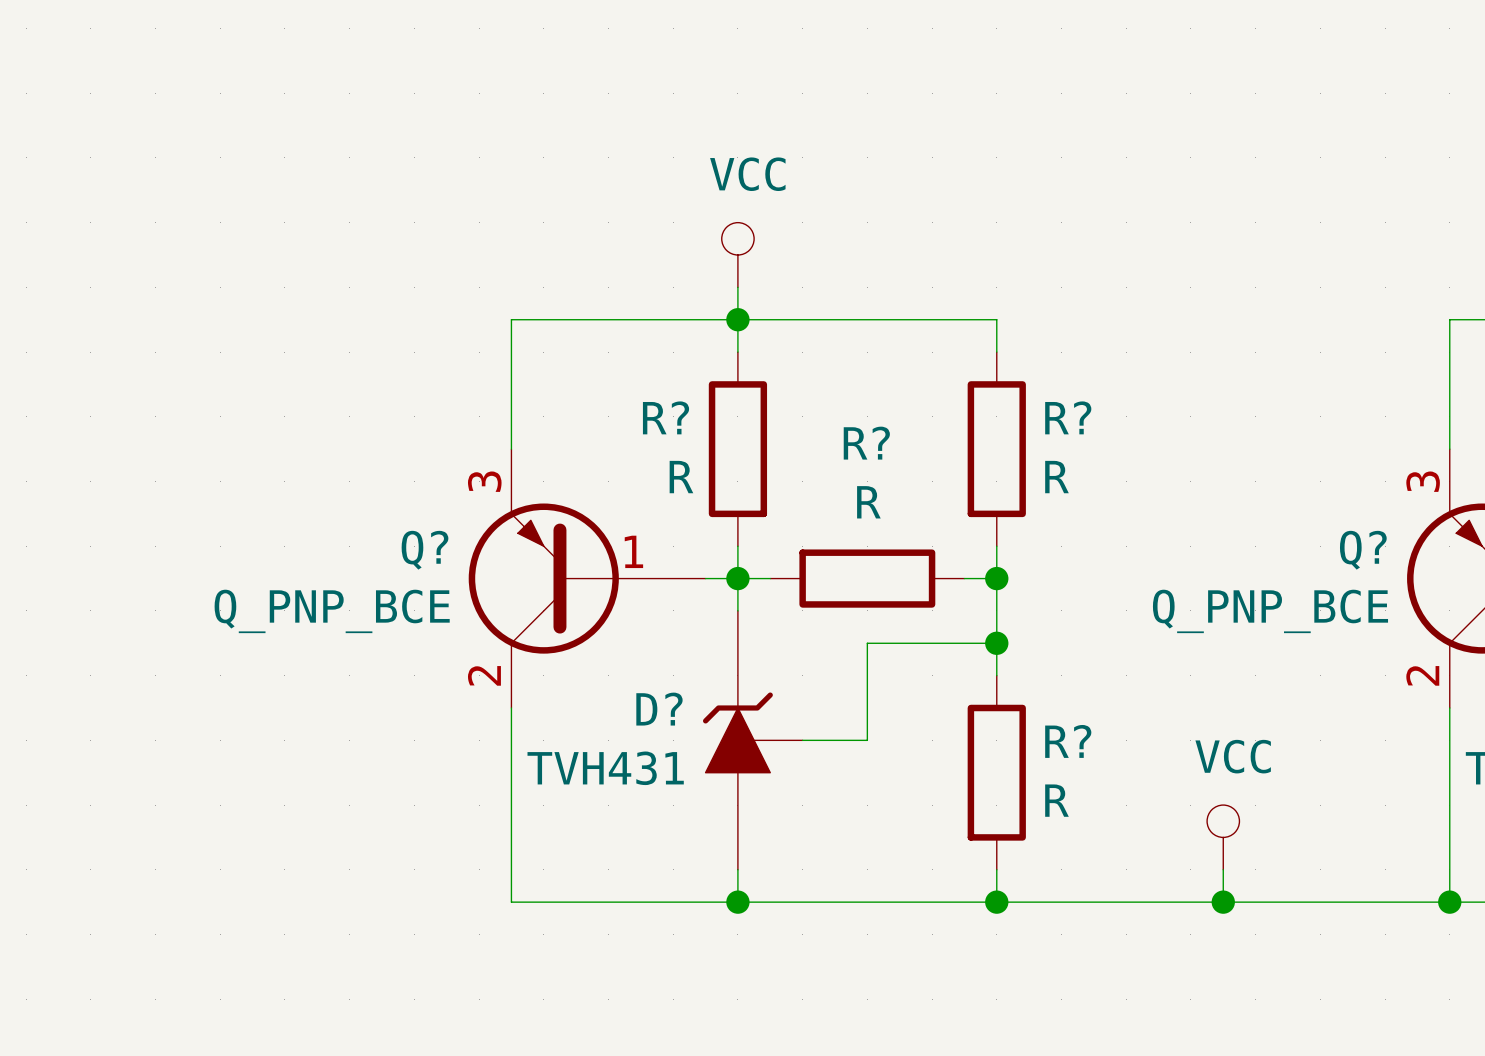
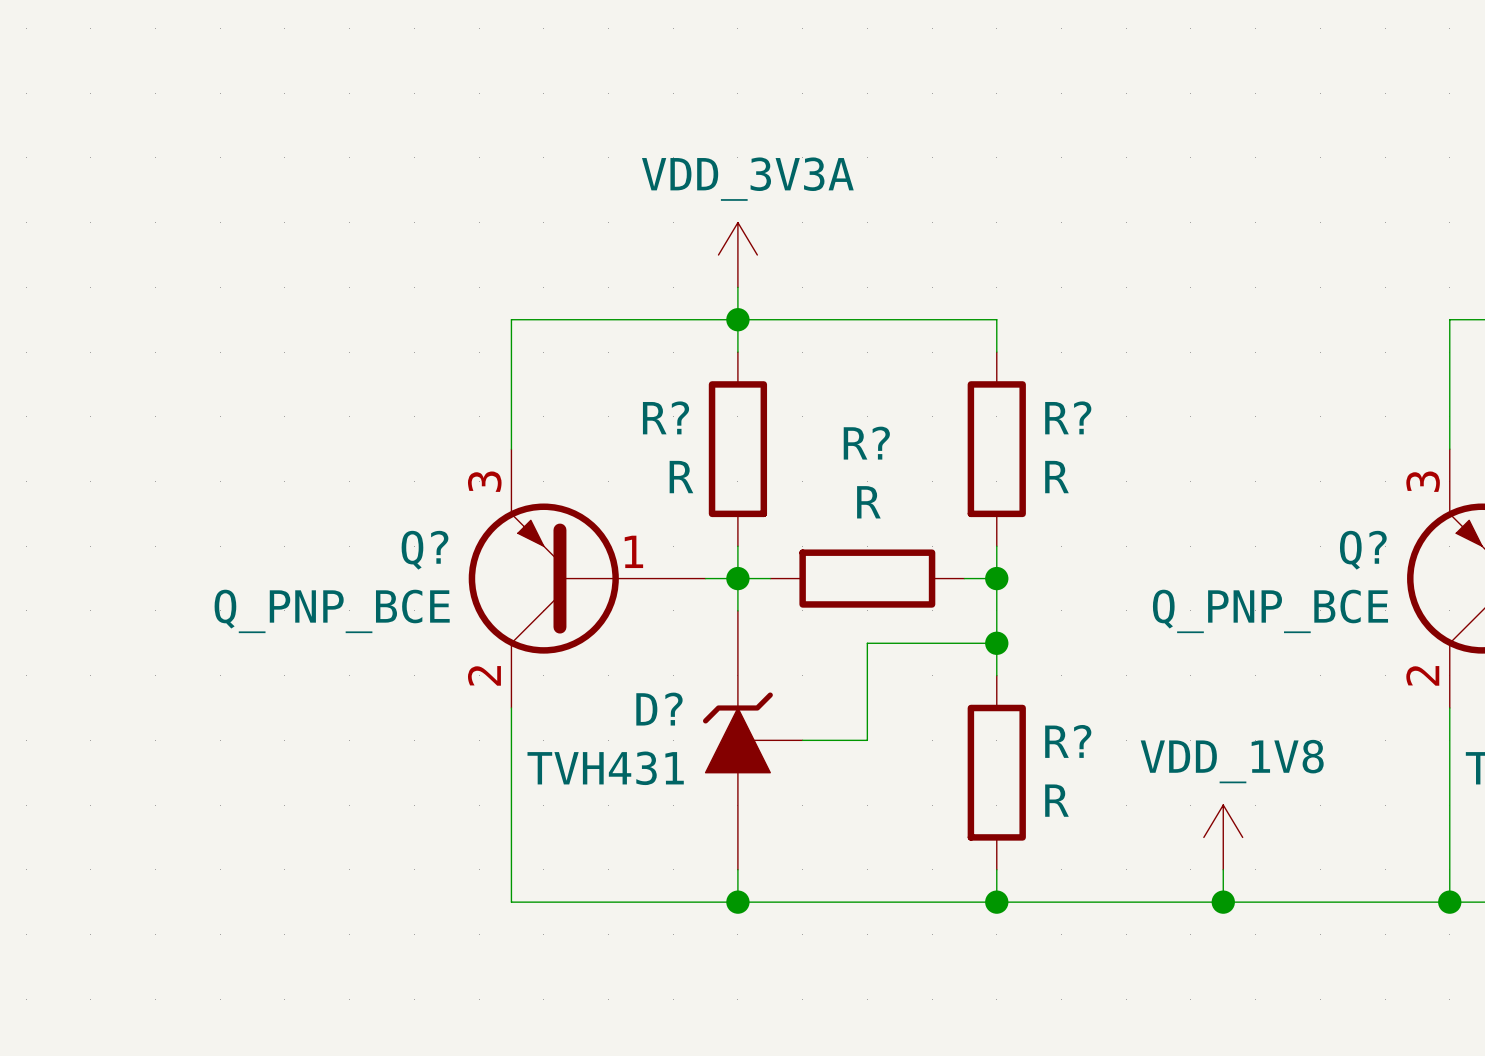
power symbol: VCC (737, 255) -> VDD_3V3A (737, 255)
power symbol: VCC (1223, 837) -> VDD_1V8 (1223, 837)

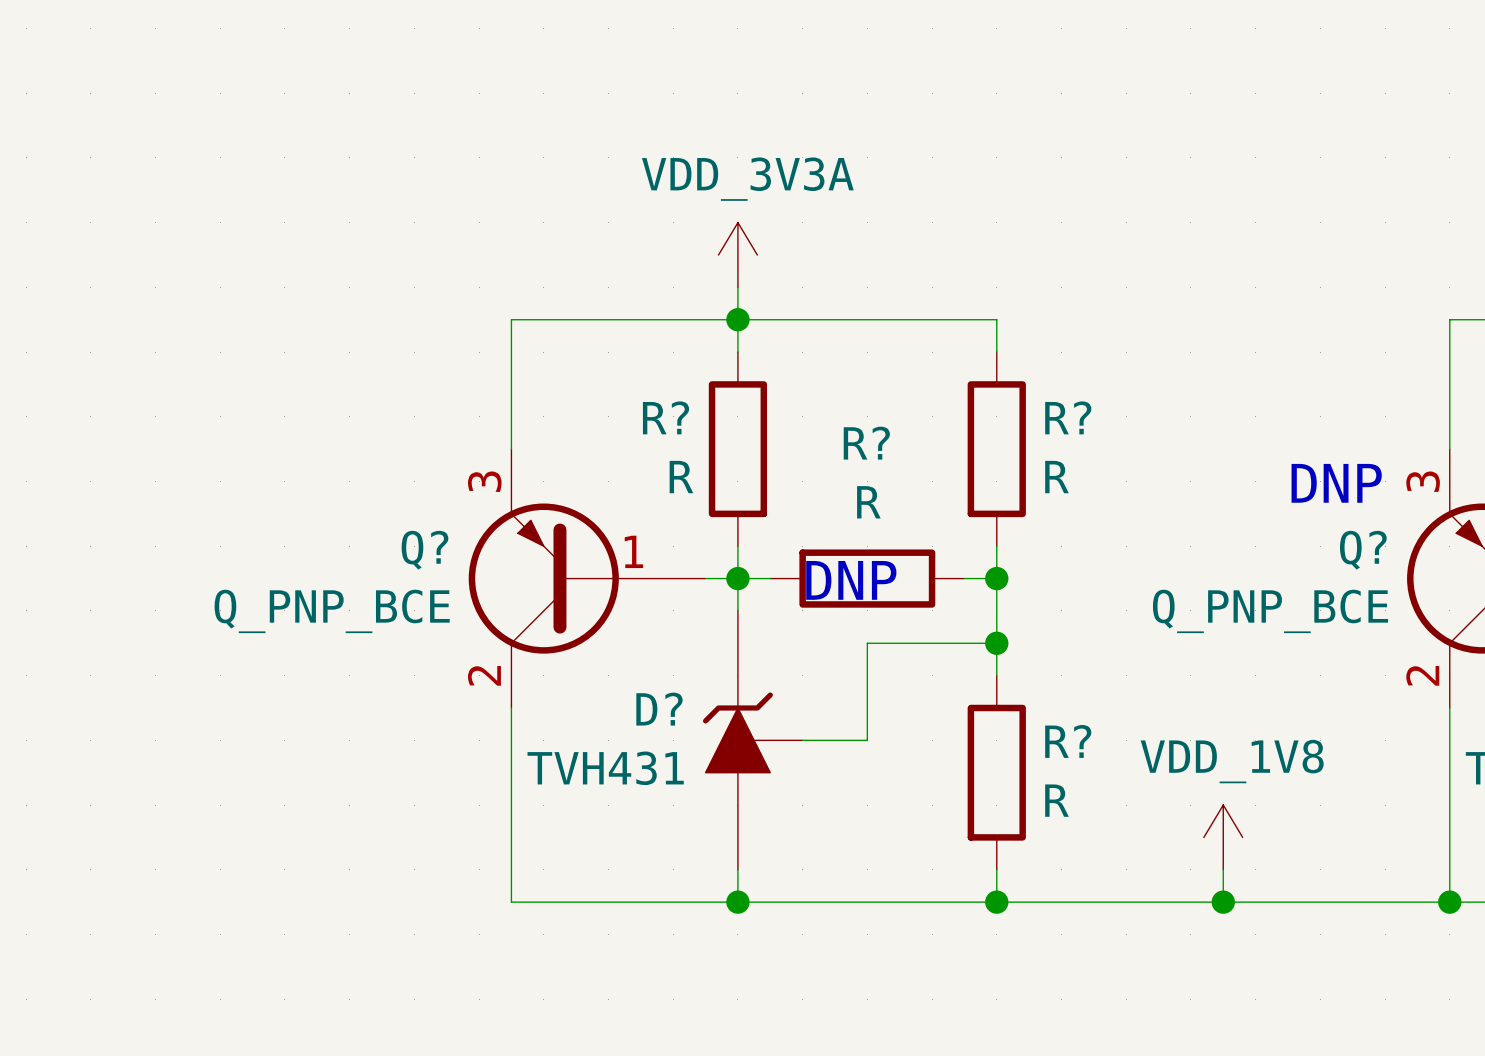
text: none -> DNP (1336, 483)
text: none -> DNP (851, 580)

